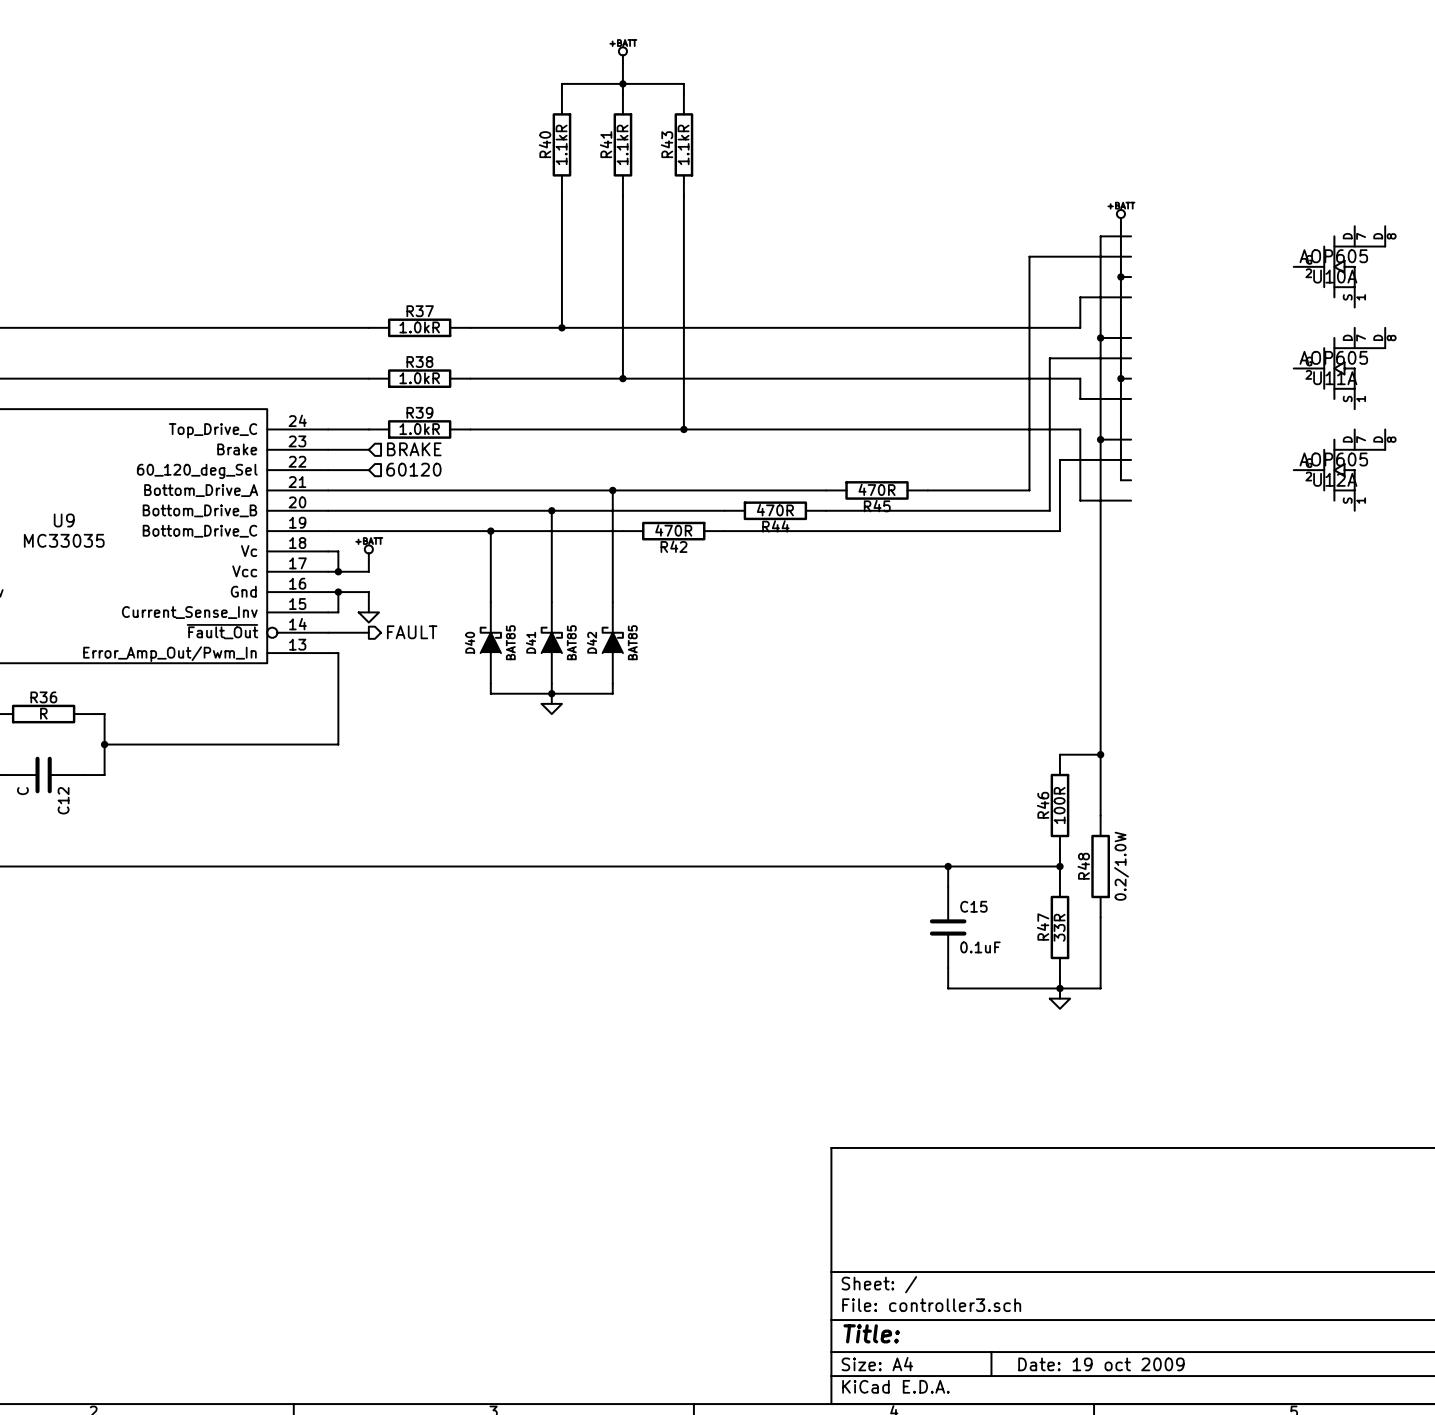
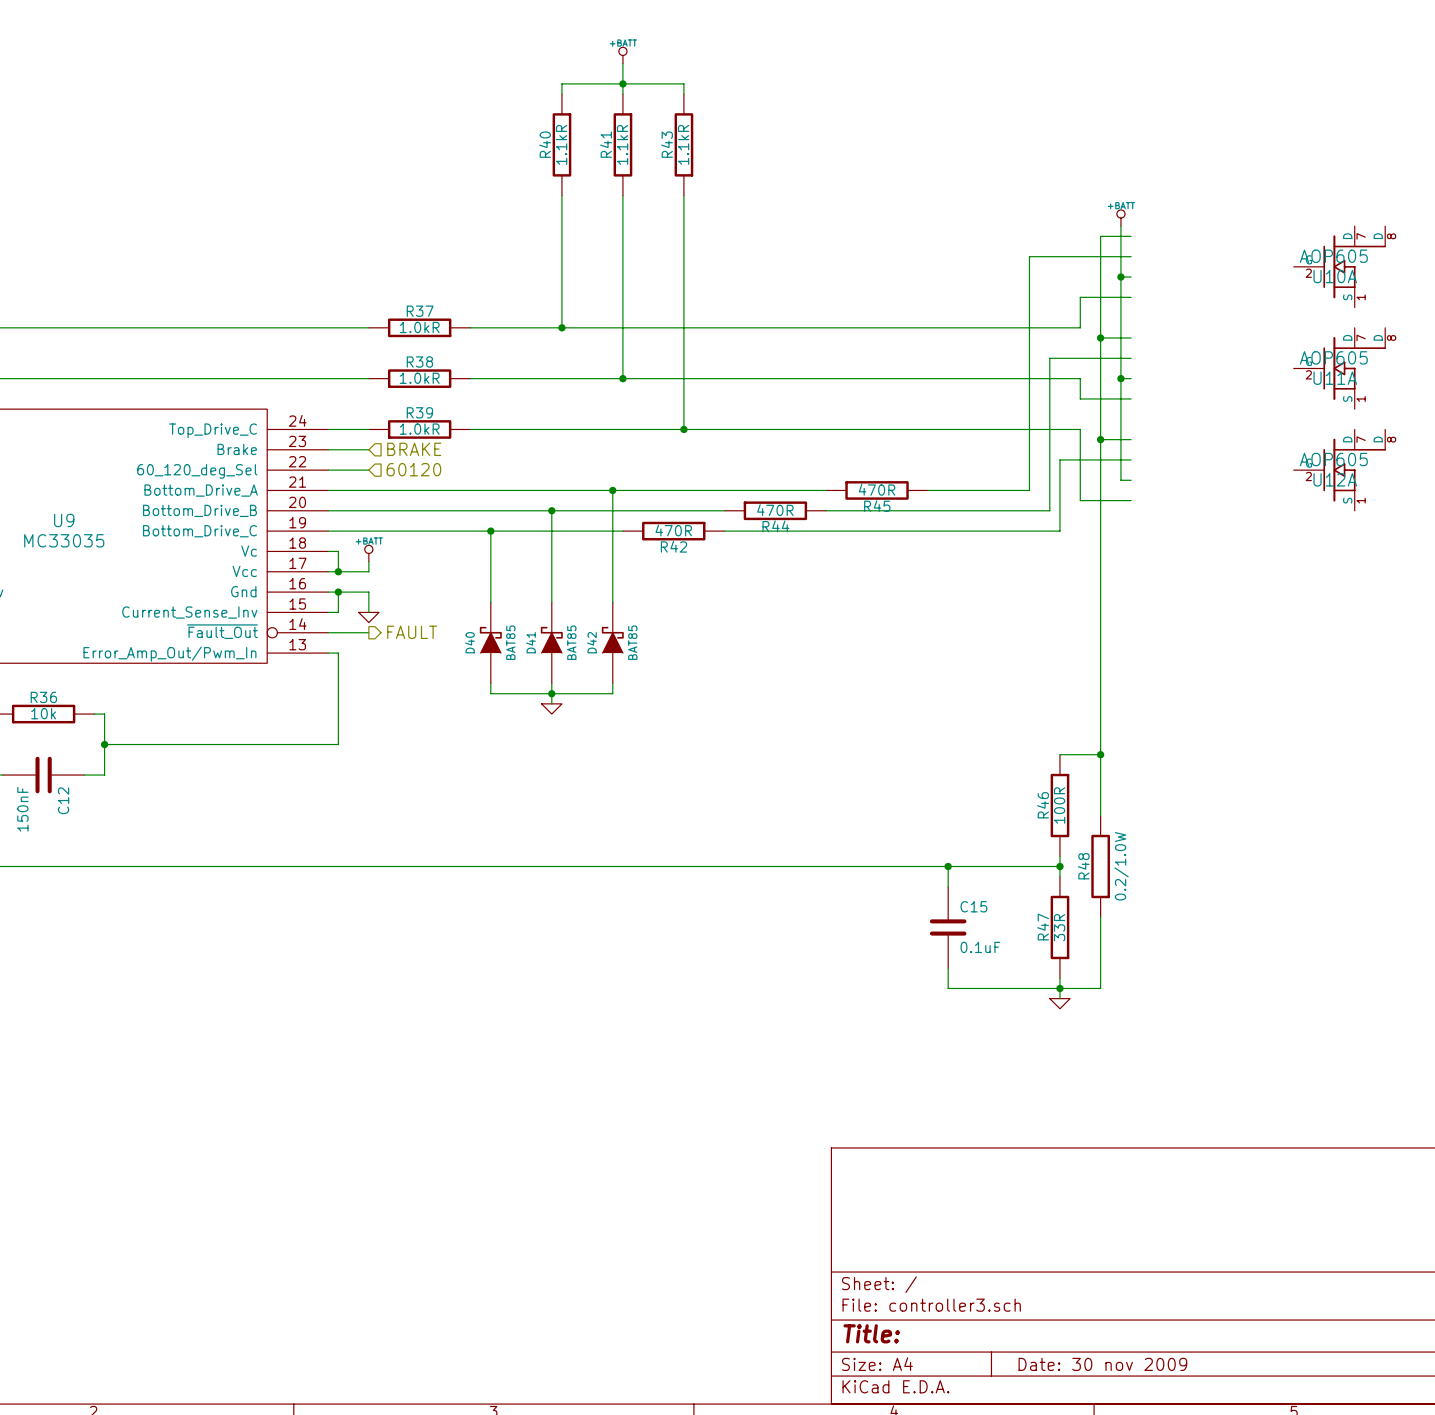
R36 value: R (43, 713) -> 10k (43, 713)
C12 value: C (22, 791) -> 150nF (22, 809)
title block: Date: 19 oct 2009 (1101, 1364) -> Date: 30 nov 2009 (1102, 1364)

